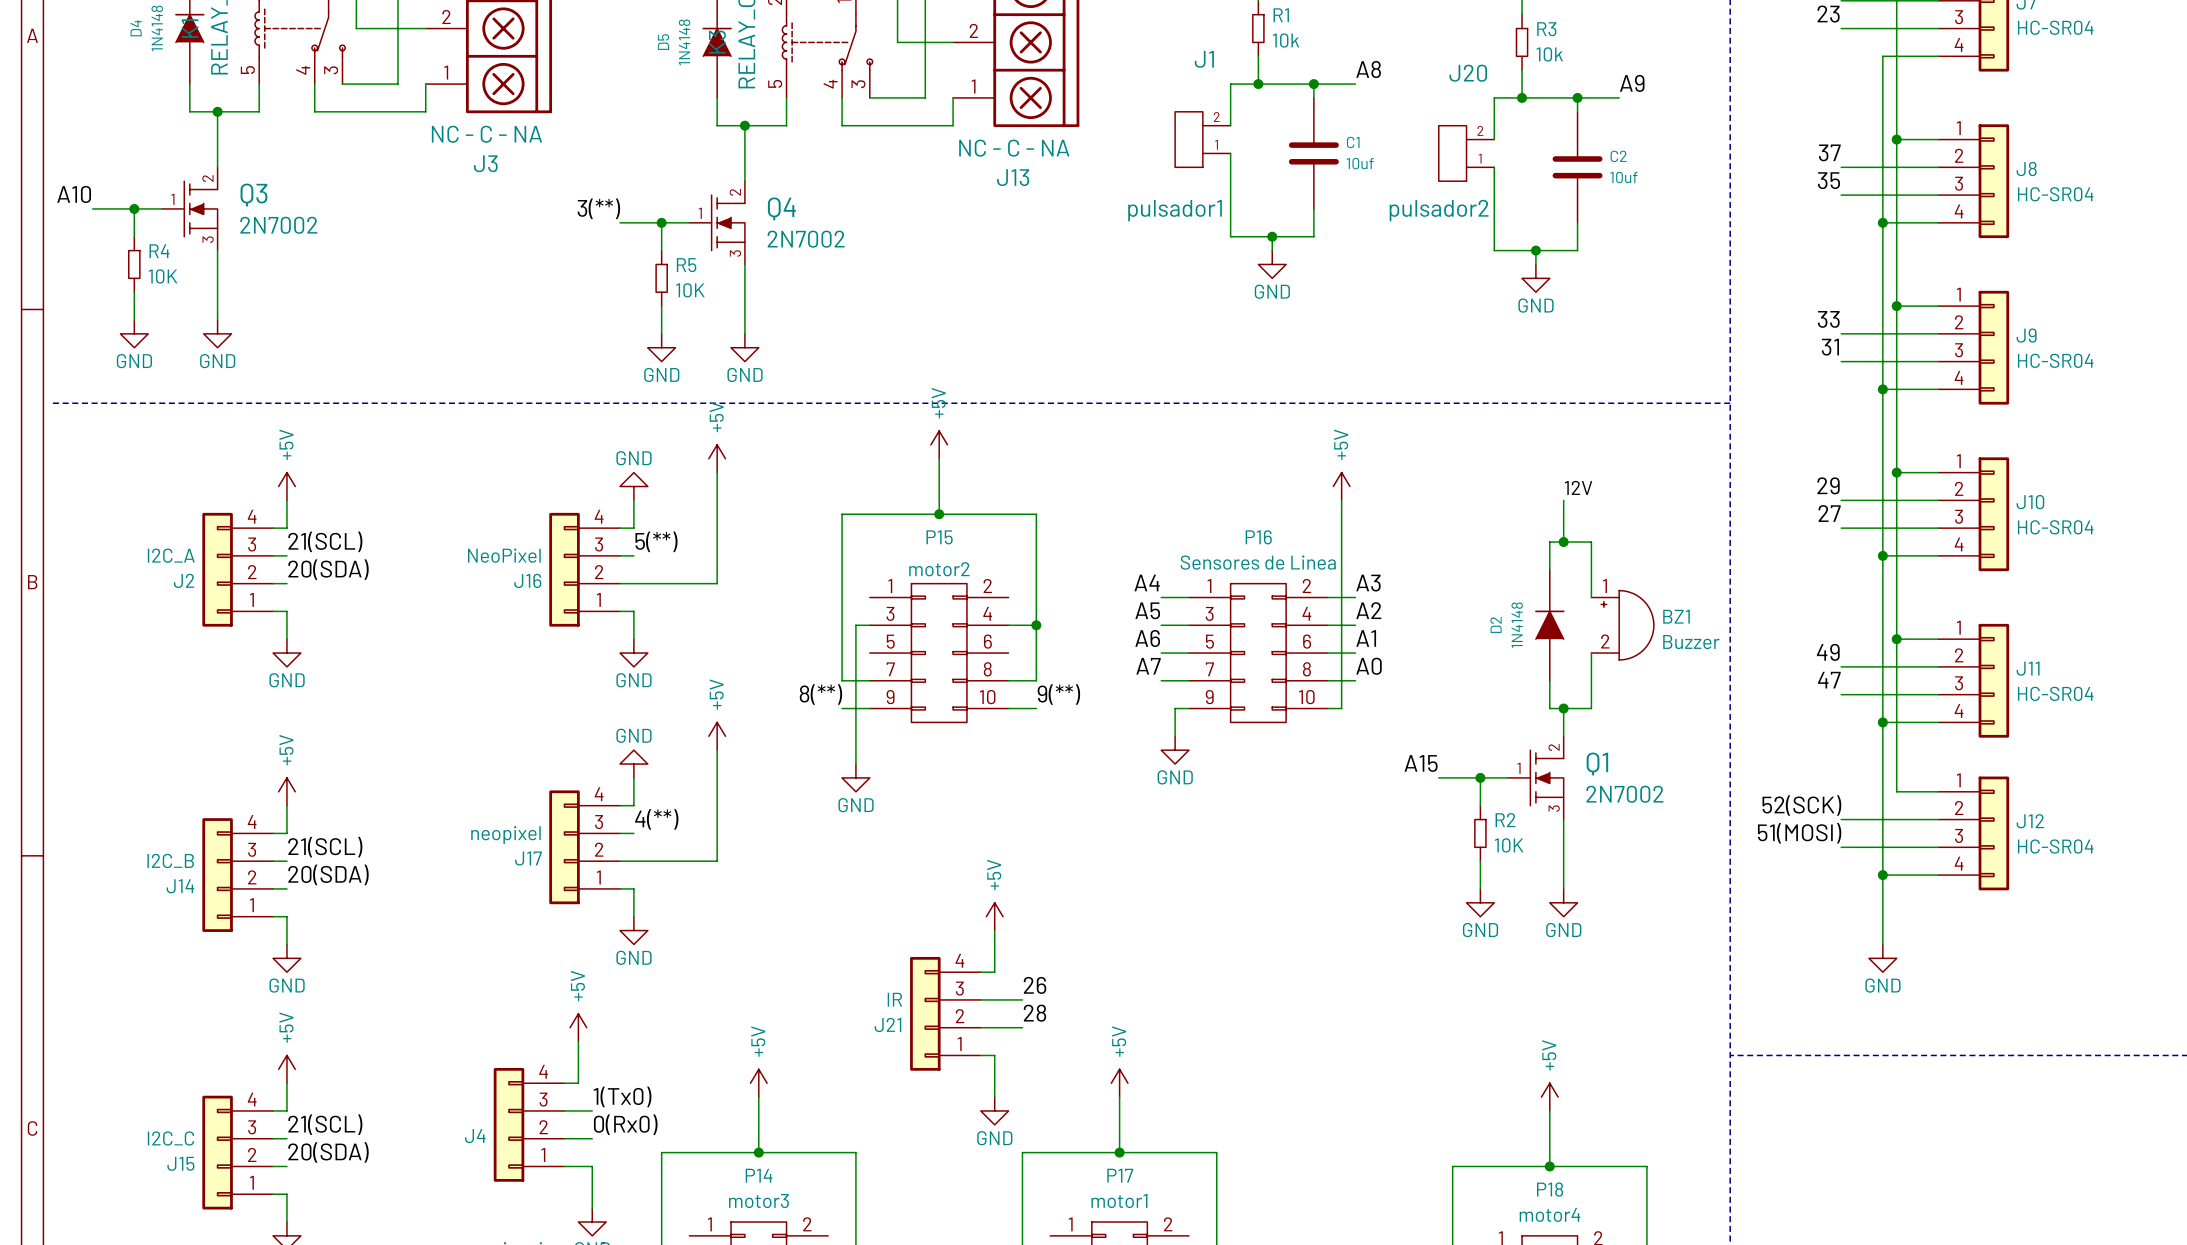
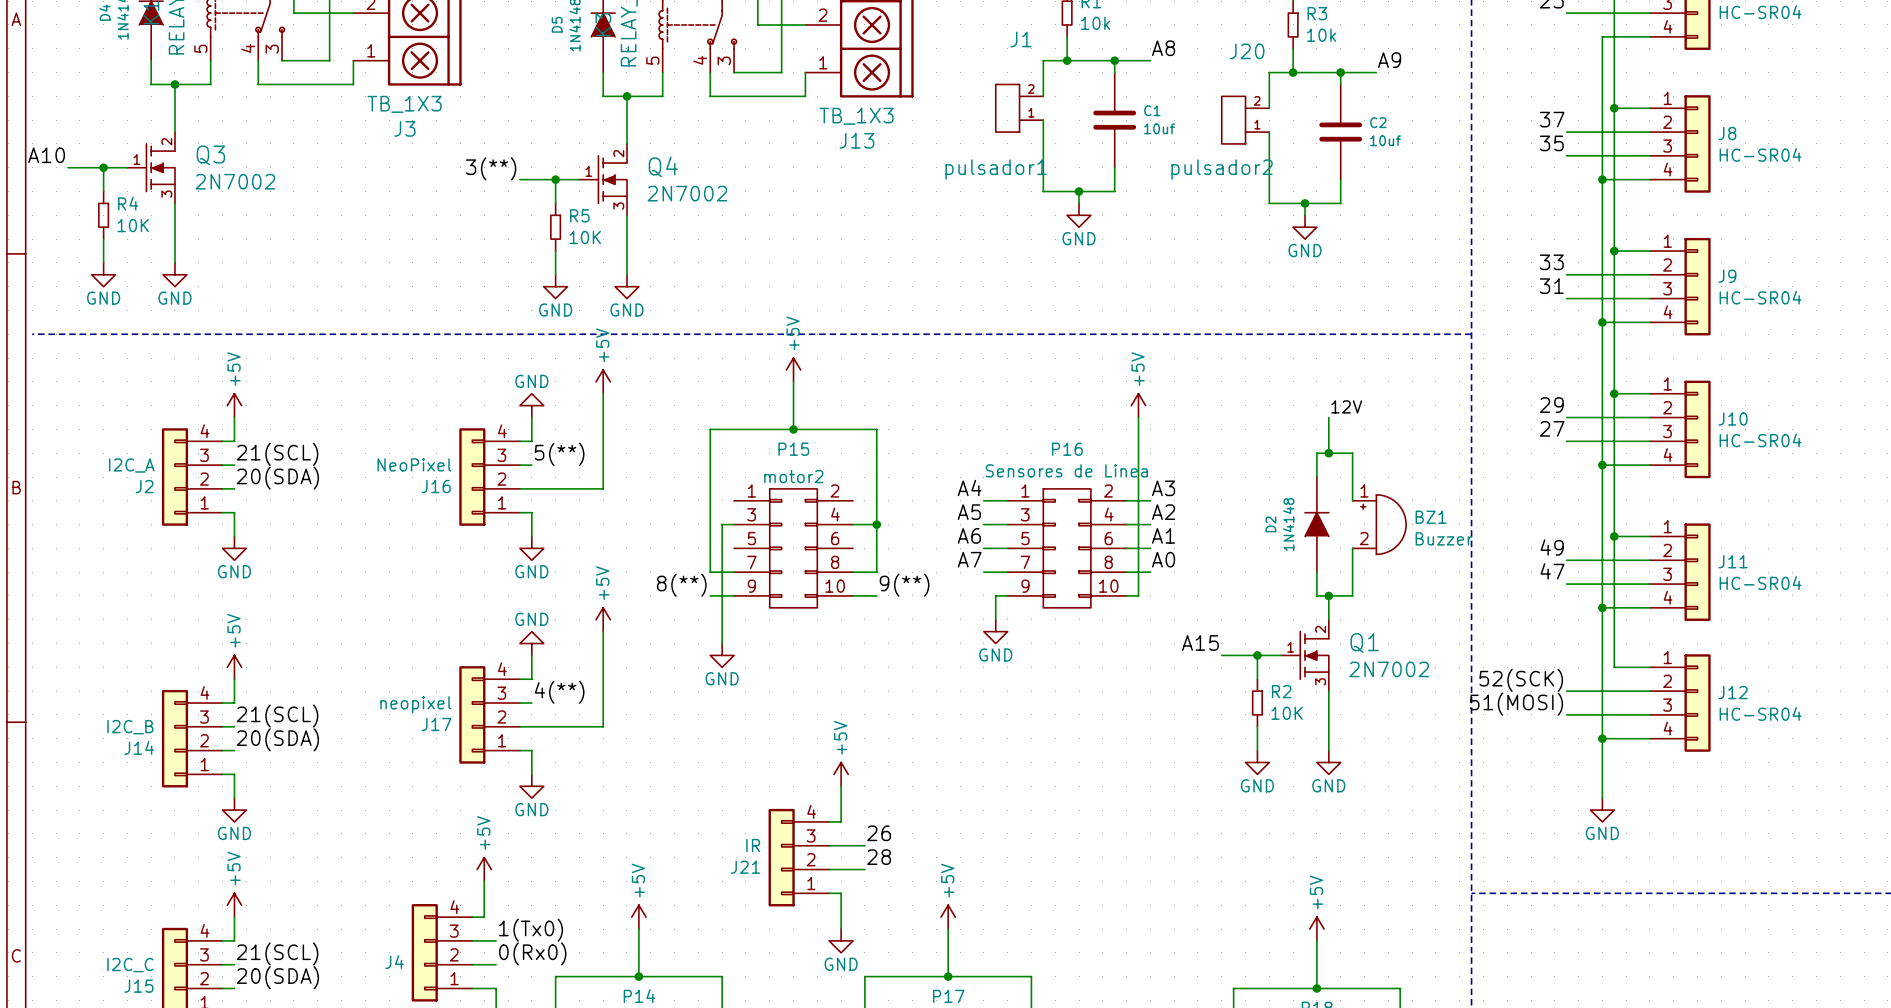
J3 value: NC - C - NA (486, 134) -> TB_1X3 (404, 104)
J13 value: NC - C - NA (1014, 148) -> TB_1X3 (856, 116)

